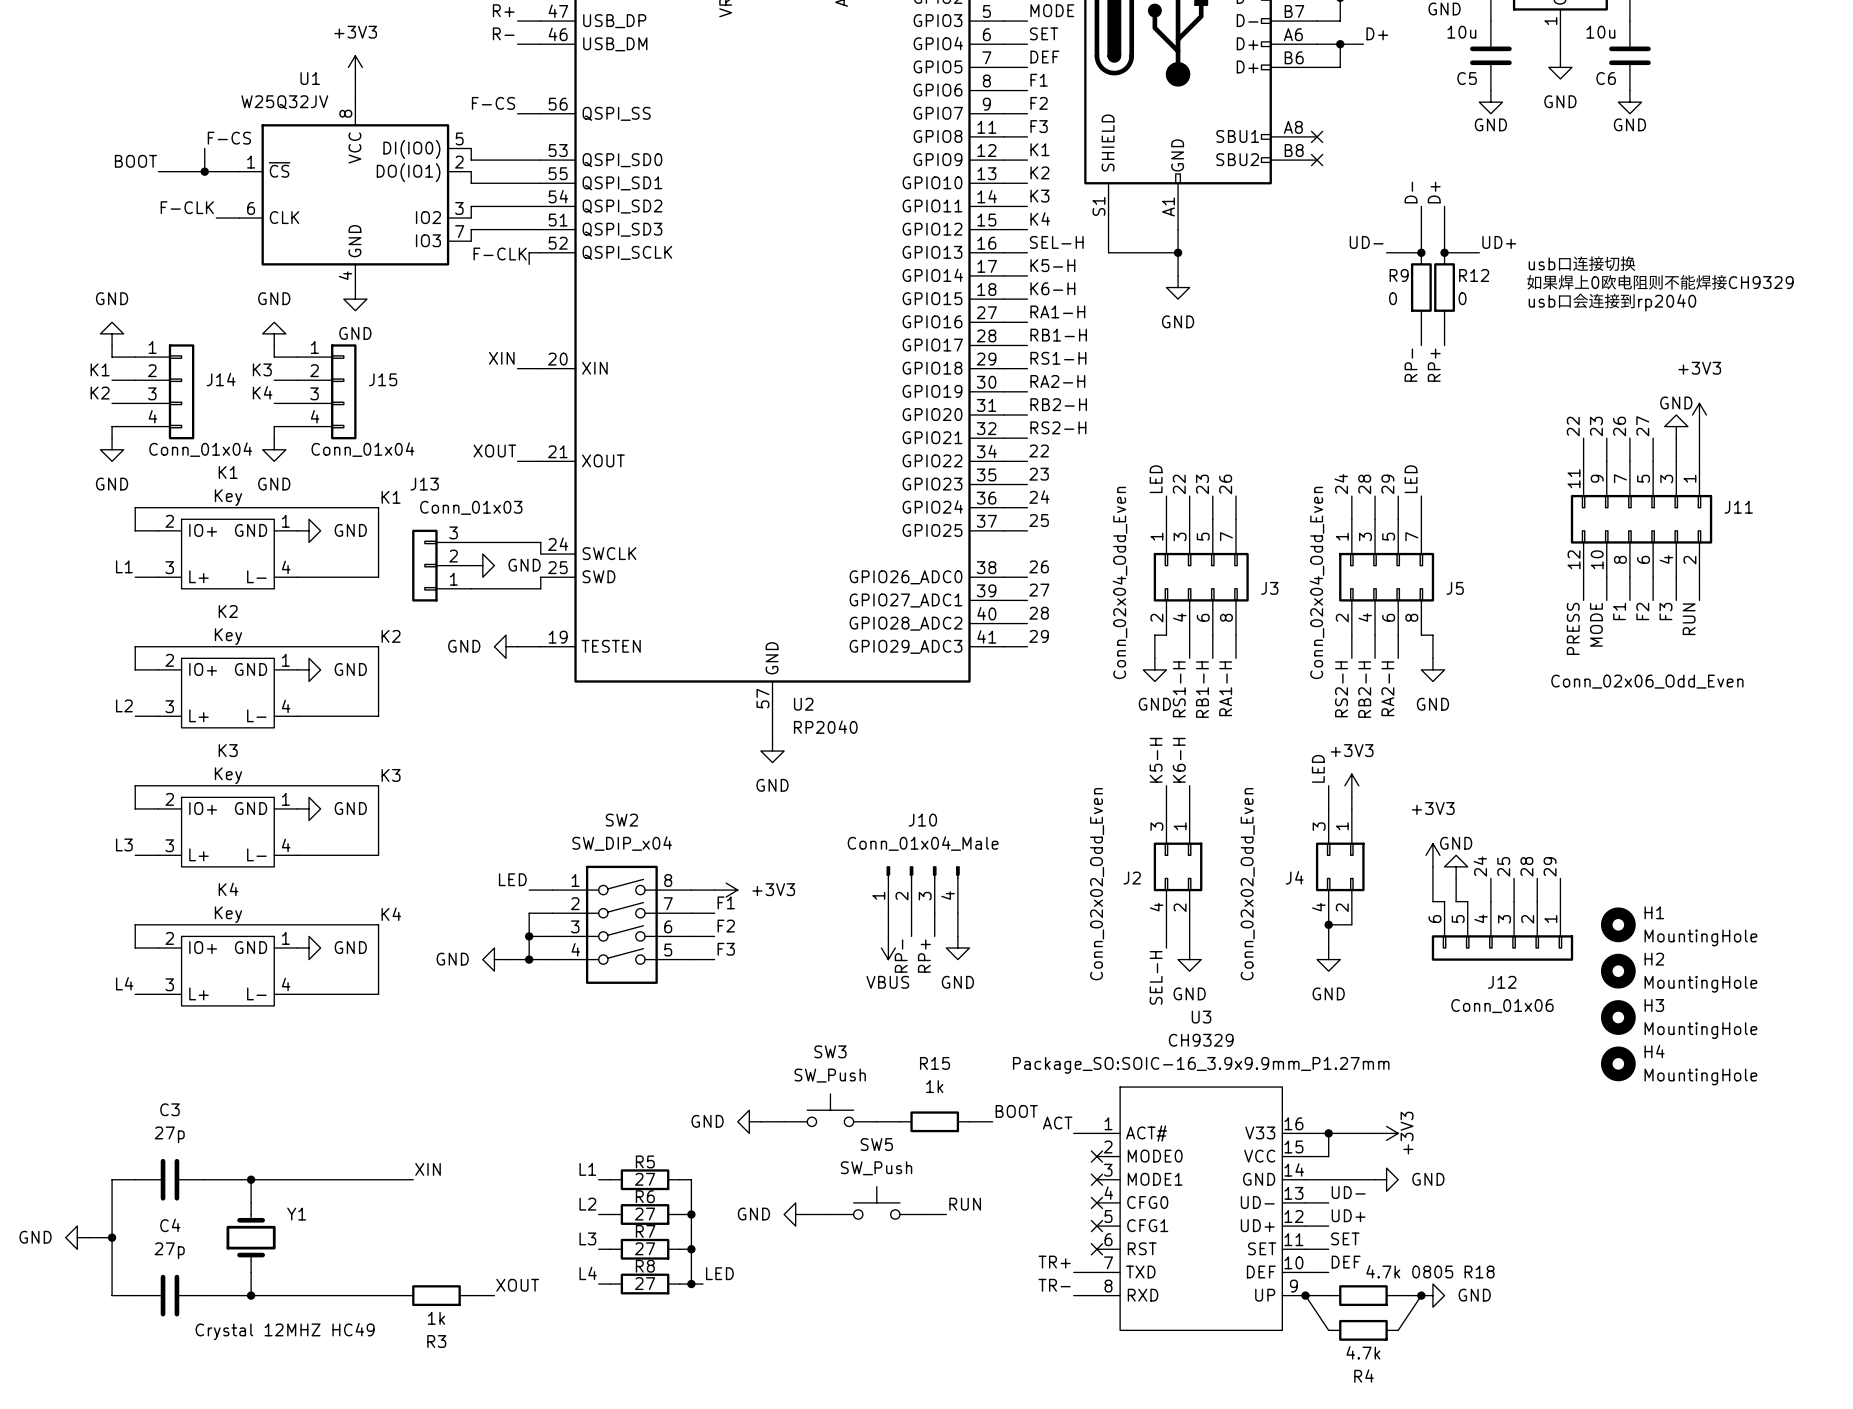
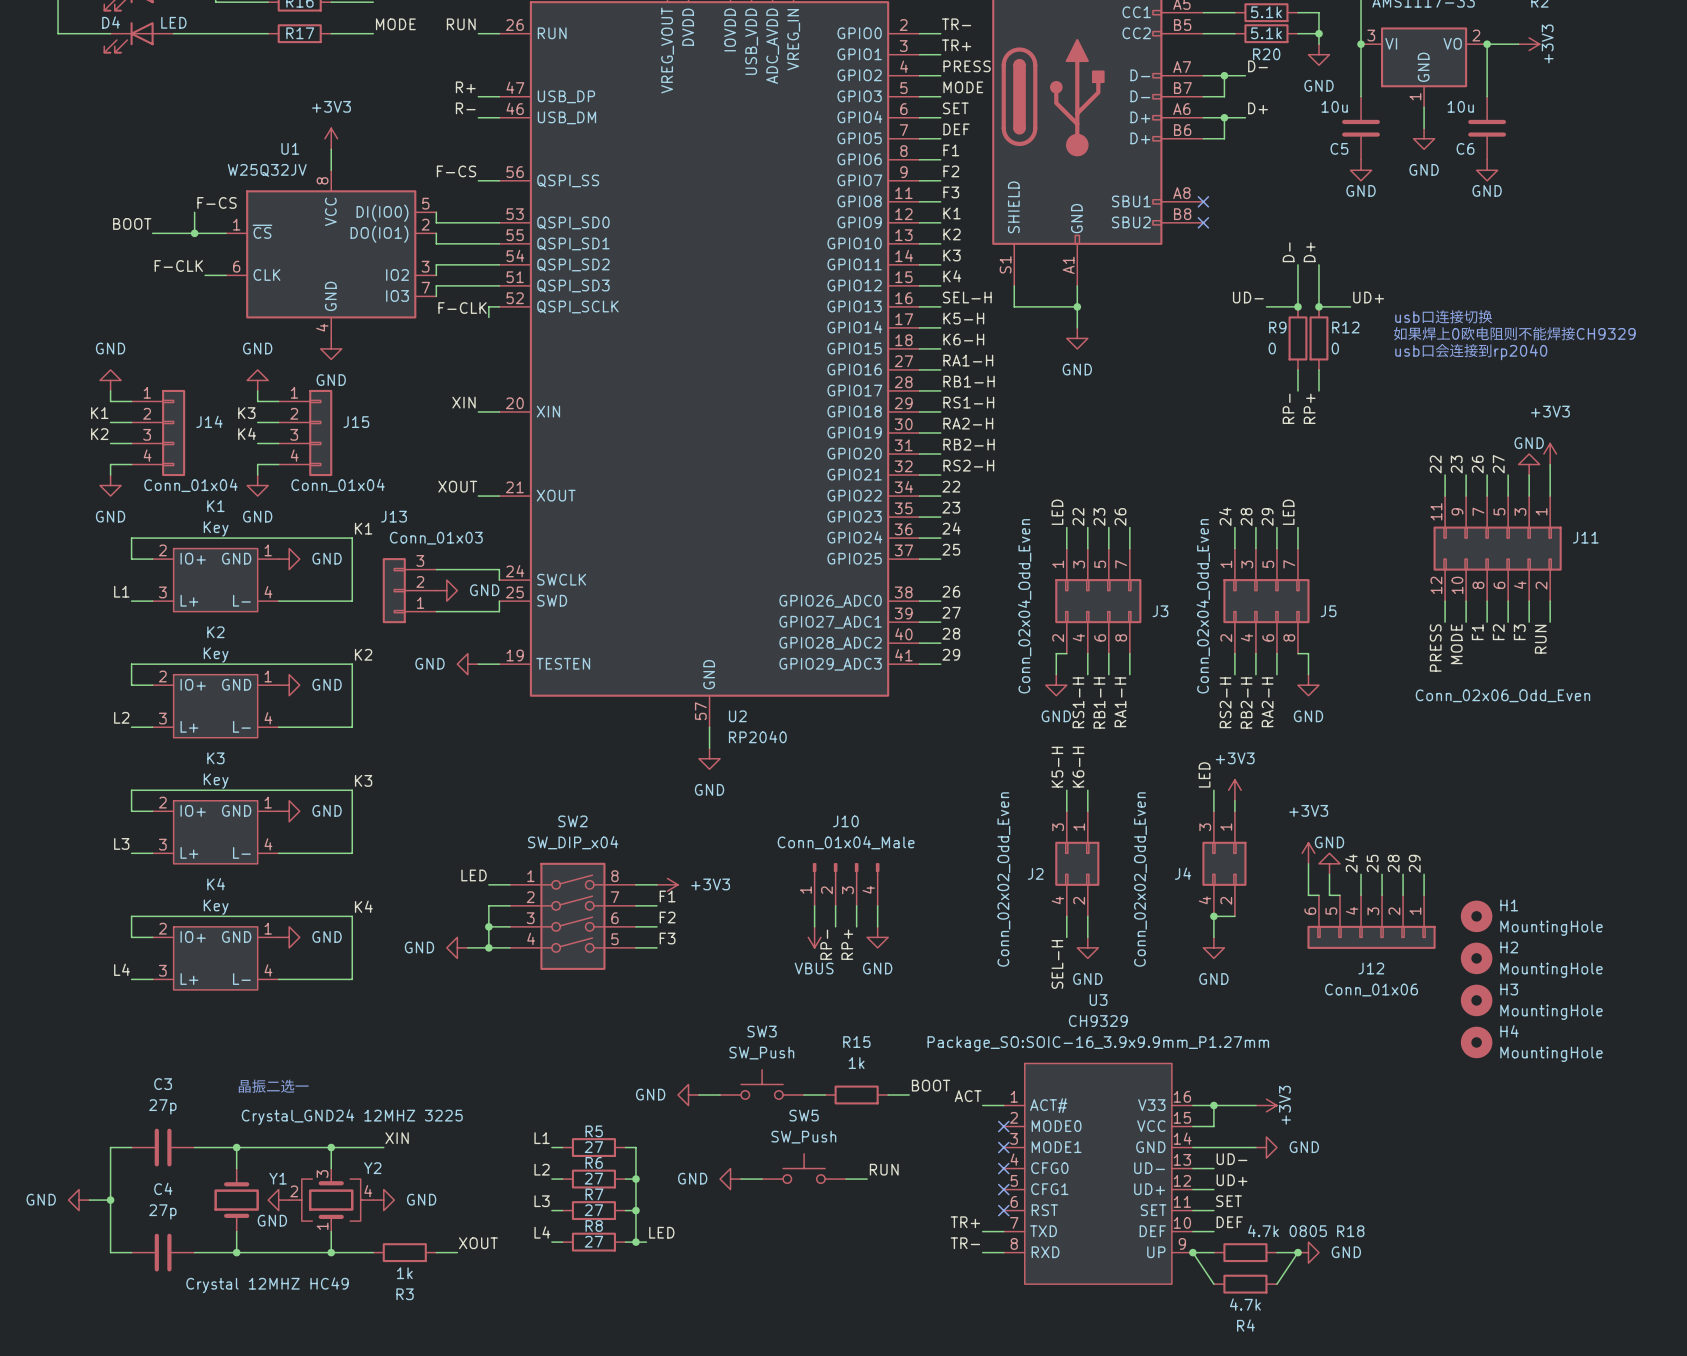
text: none -> 晶振二选一 (273, 1086)
wire: none -> (331, 1147) (331, 1168)
junction: none -> (331, 1147)
power symbol: none -> GND (278, 1200)
Y2: none -> Crystal_GND24 12MHZ 3225 (331, 1200)
power symbol: none -> GND (383, 1200)
wire: none -> (331, 1231) (331, 1252)
junction: none -> (331, 1252)

